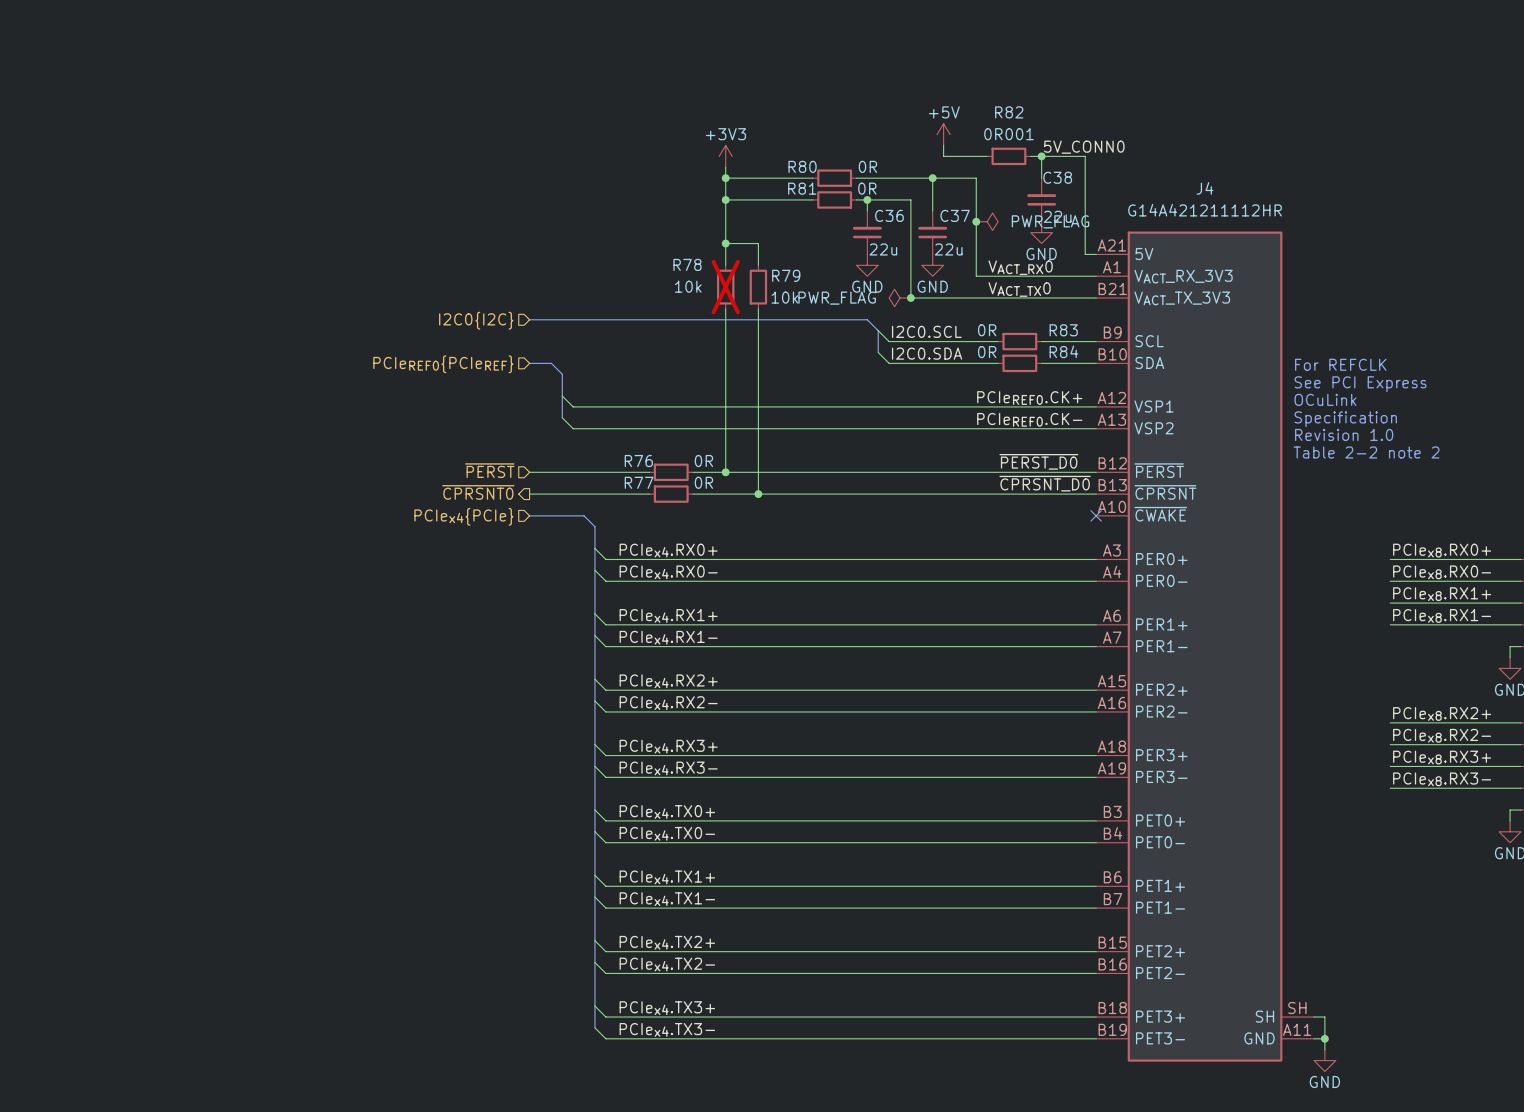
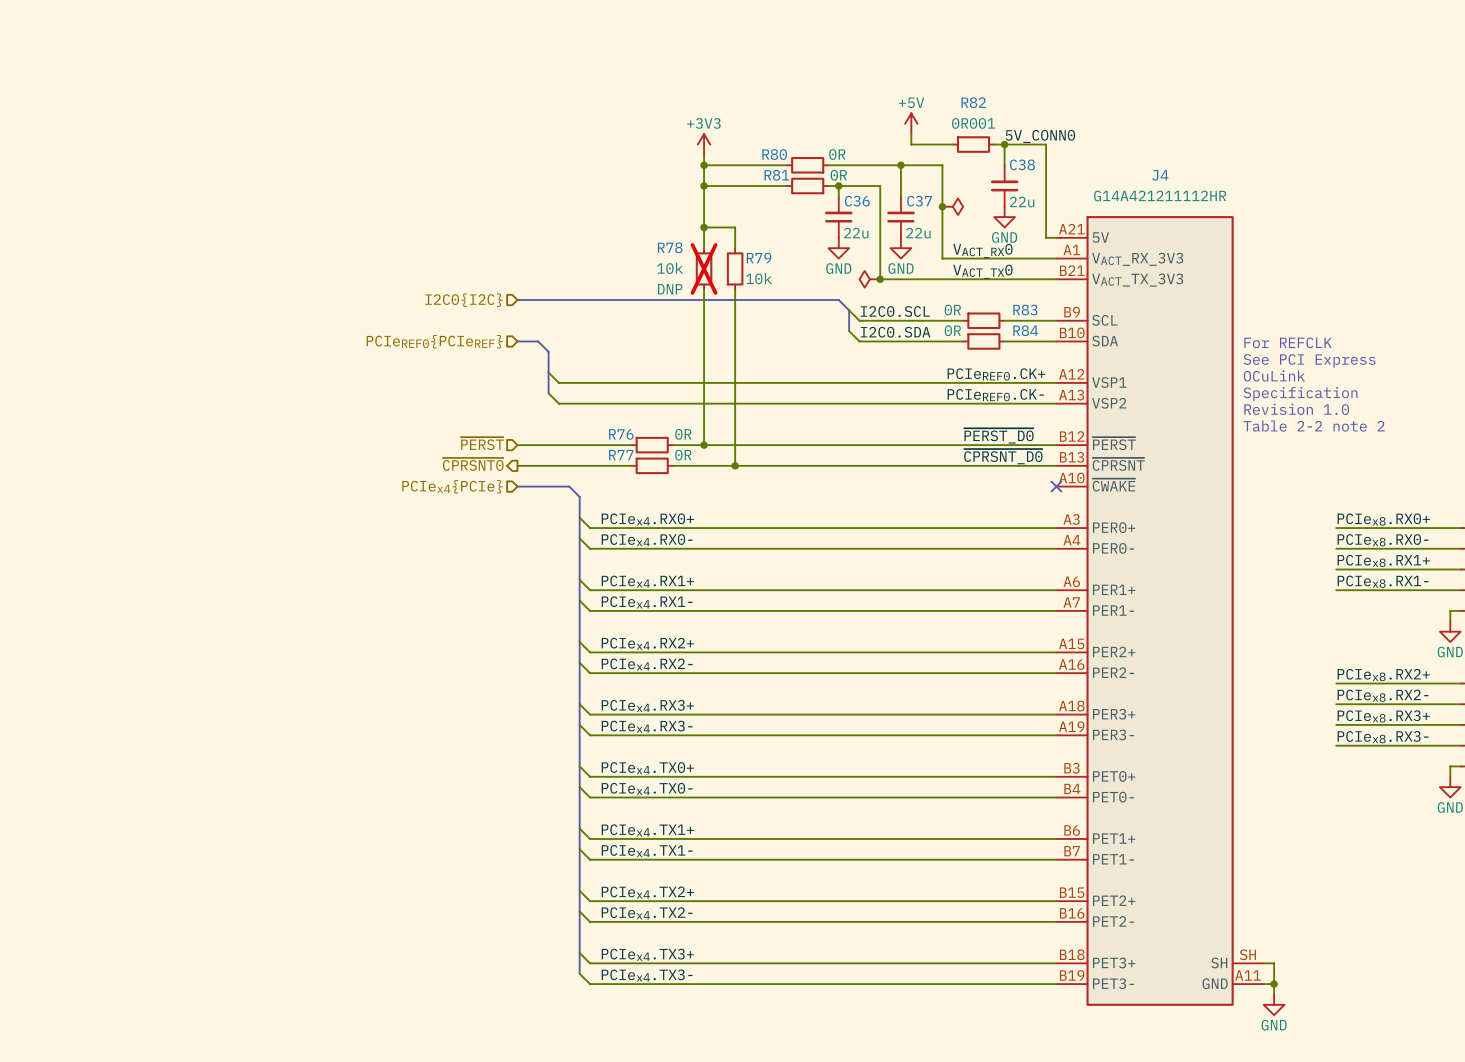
power symbol text: PWR_FLAG (1050, 221) -> none
power symbol text: PWR_FLAG (837, 298) -> none
R78 text: none -> DNP (670, 289)

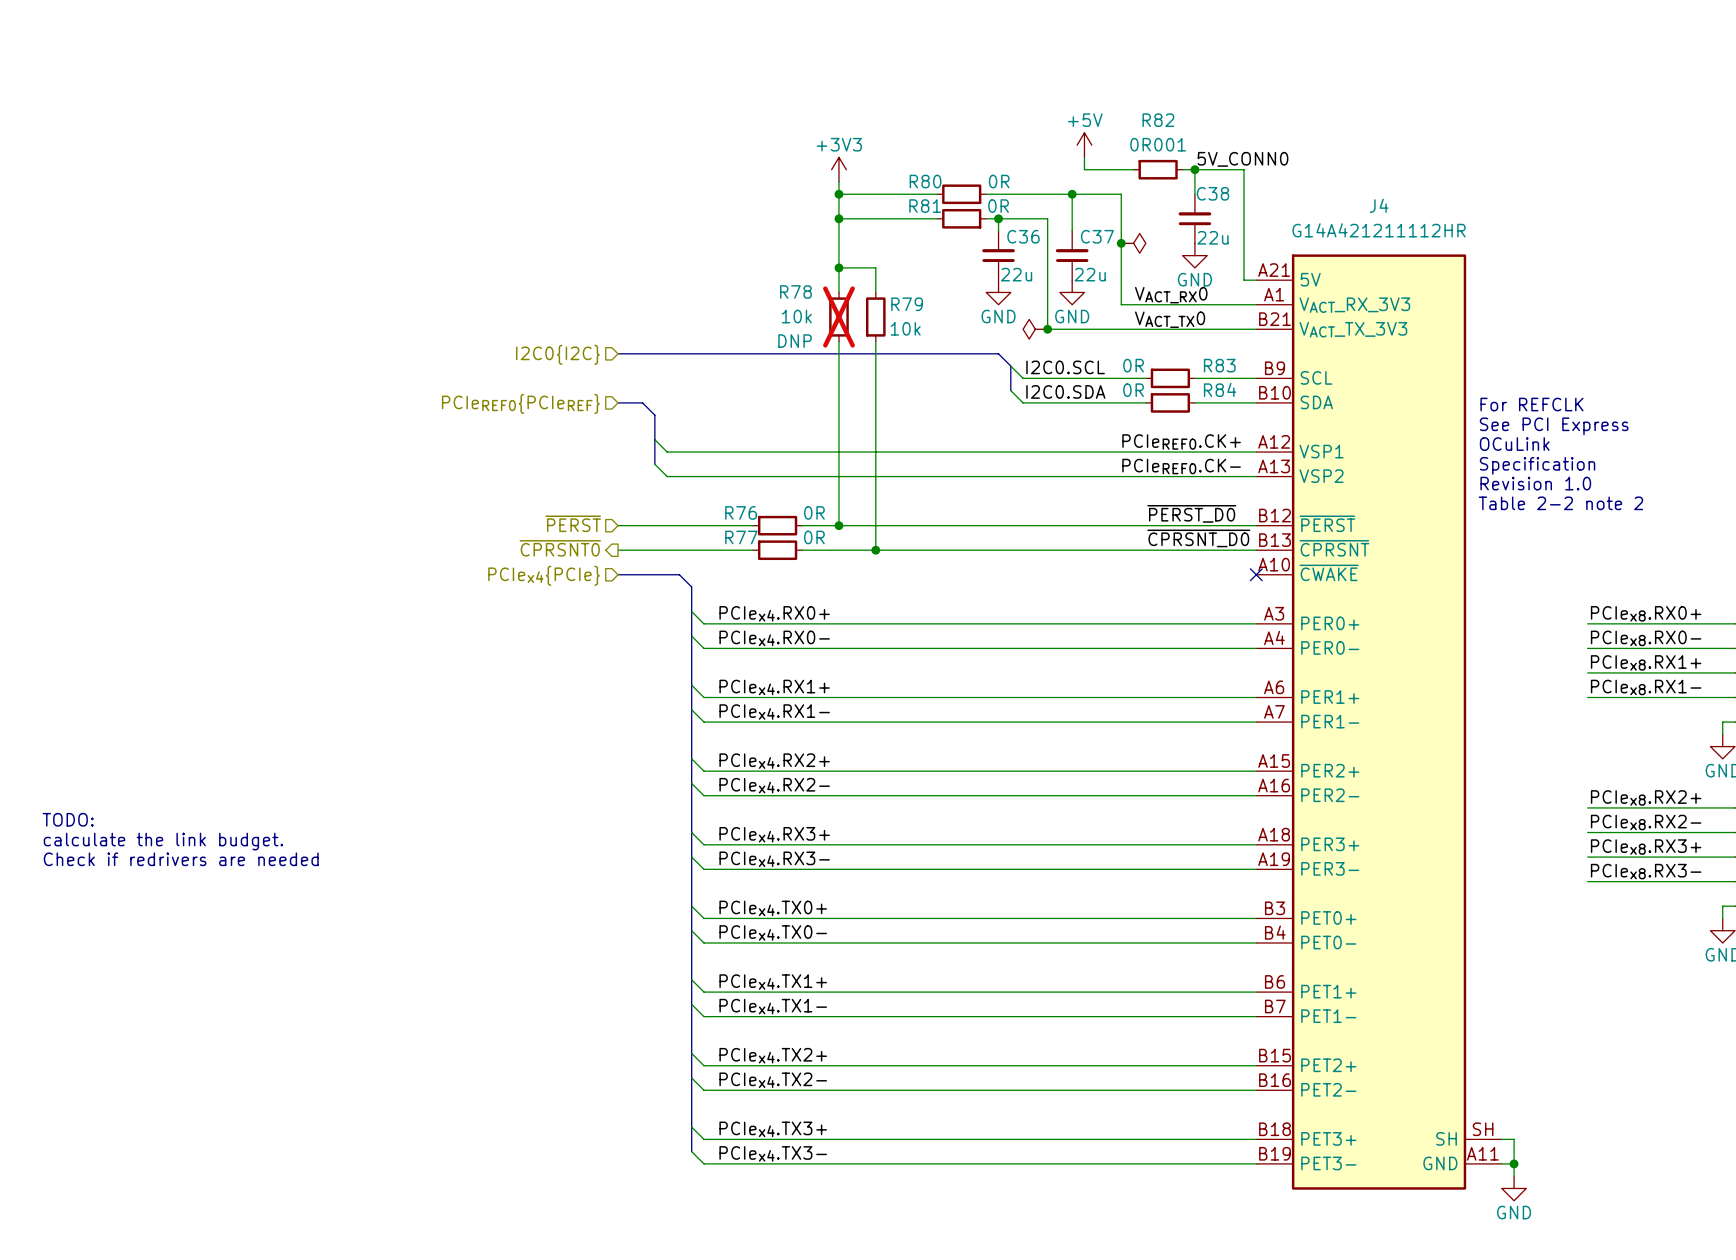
text: none -> TODO: (68, 819)
text: none -> calculate the link budget. (163, 841)
text: none -> Check if redrivers are needed (181, 859)

